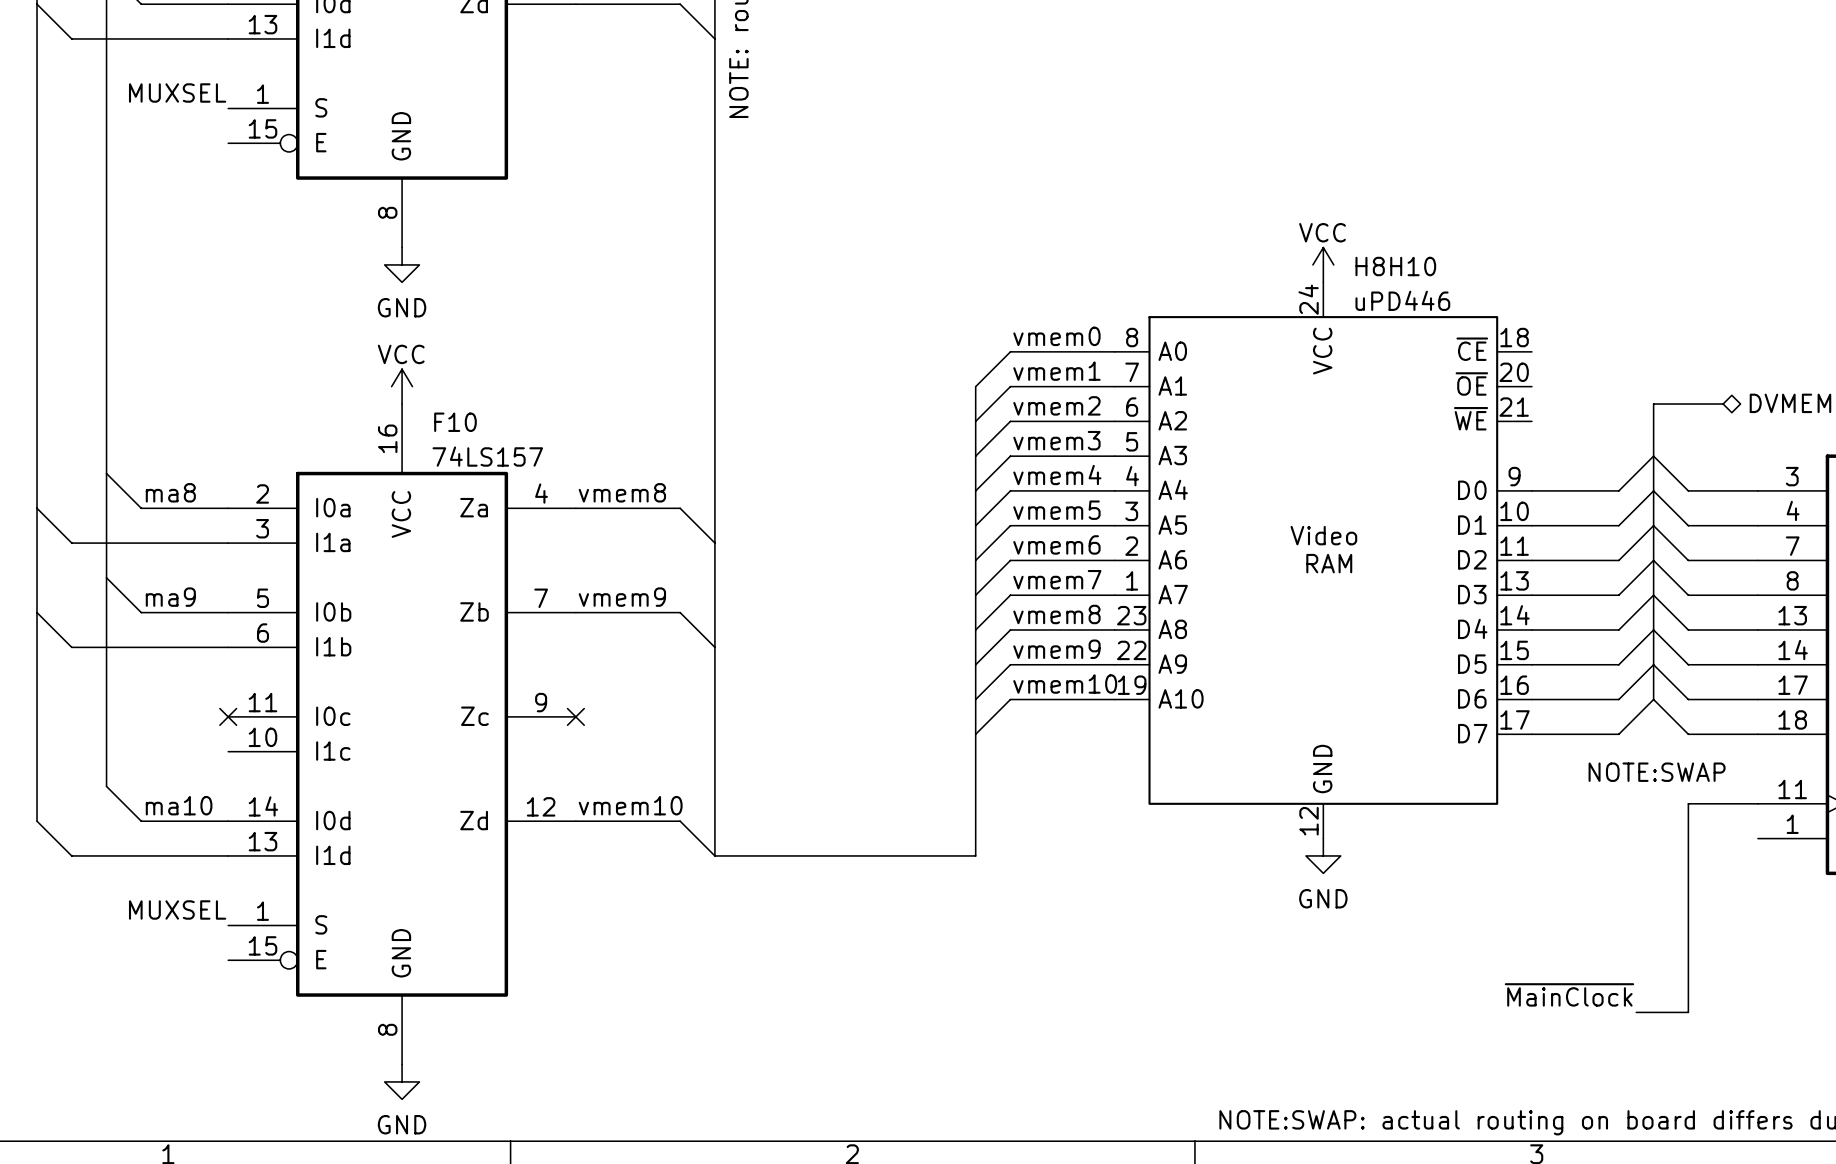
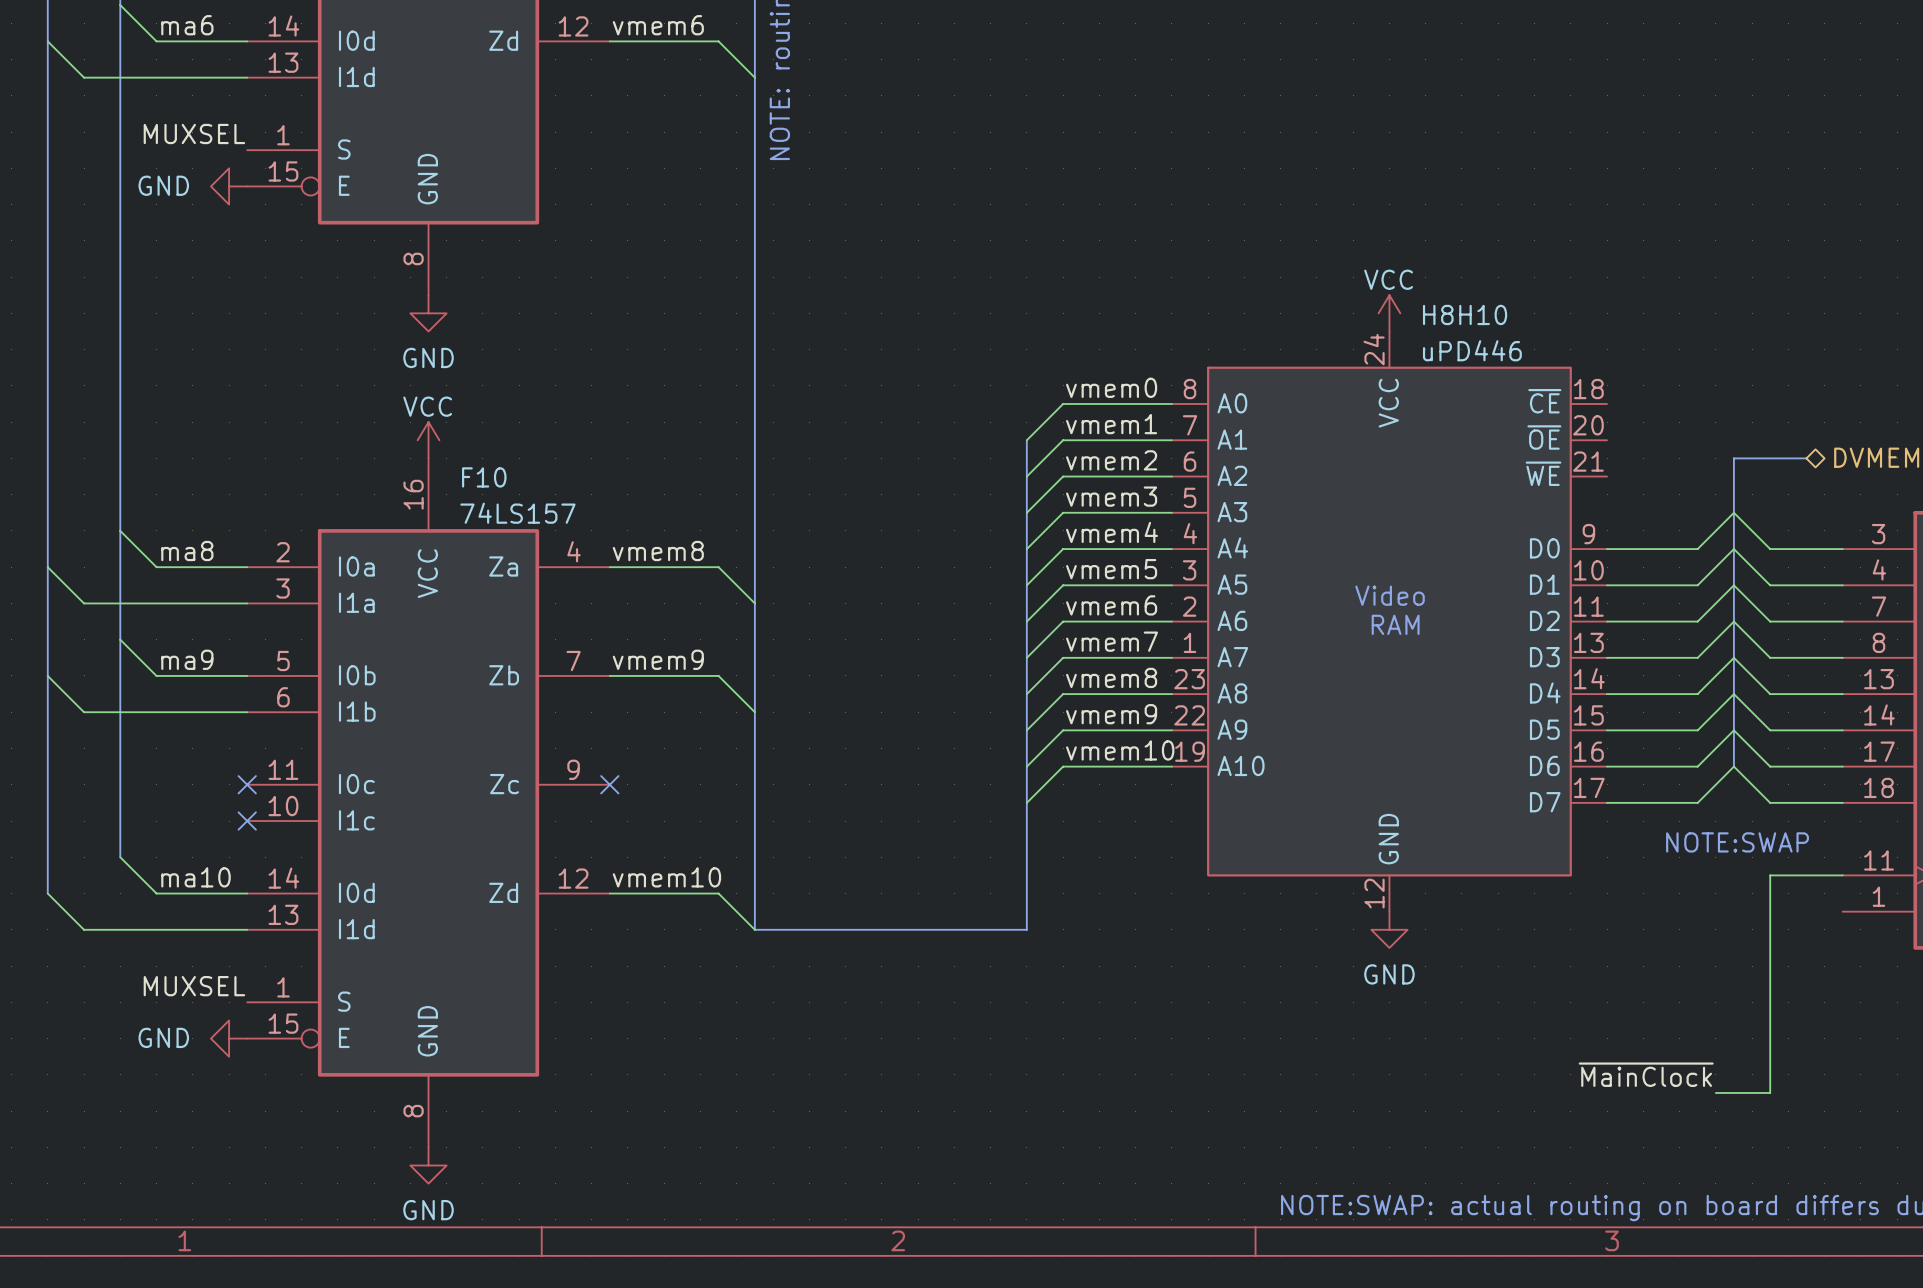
power symbol: none -> GND (229, 186)
no-connect mark: none -> (247, 821)
power symbol: none -> GND (229, 1038)

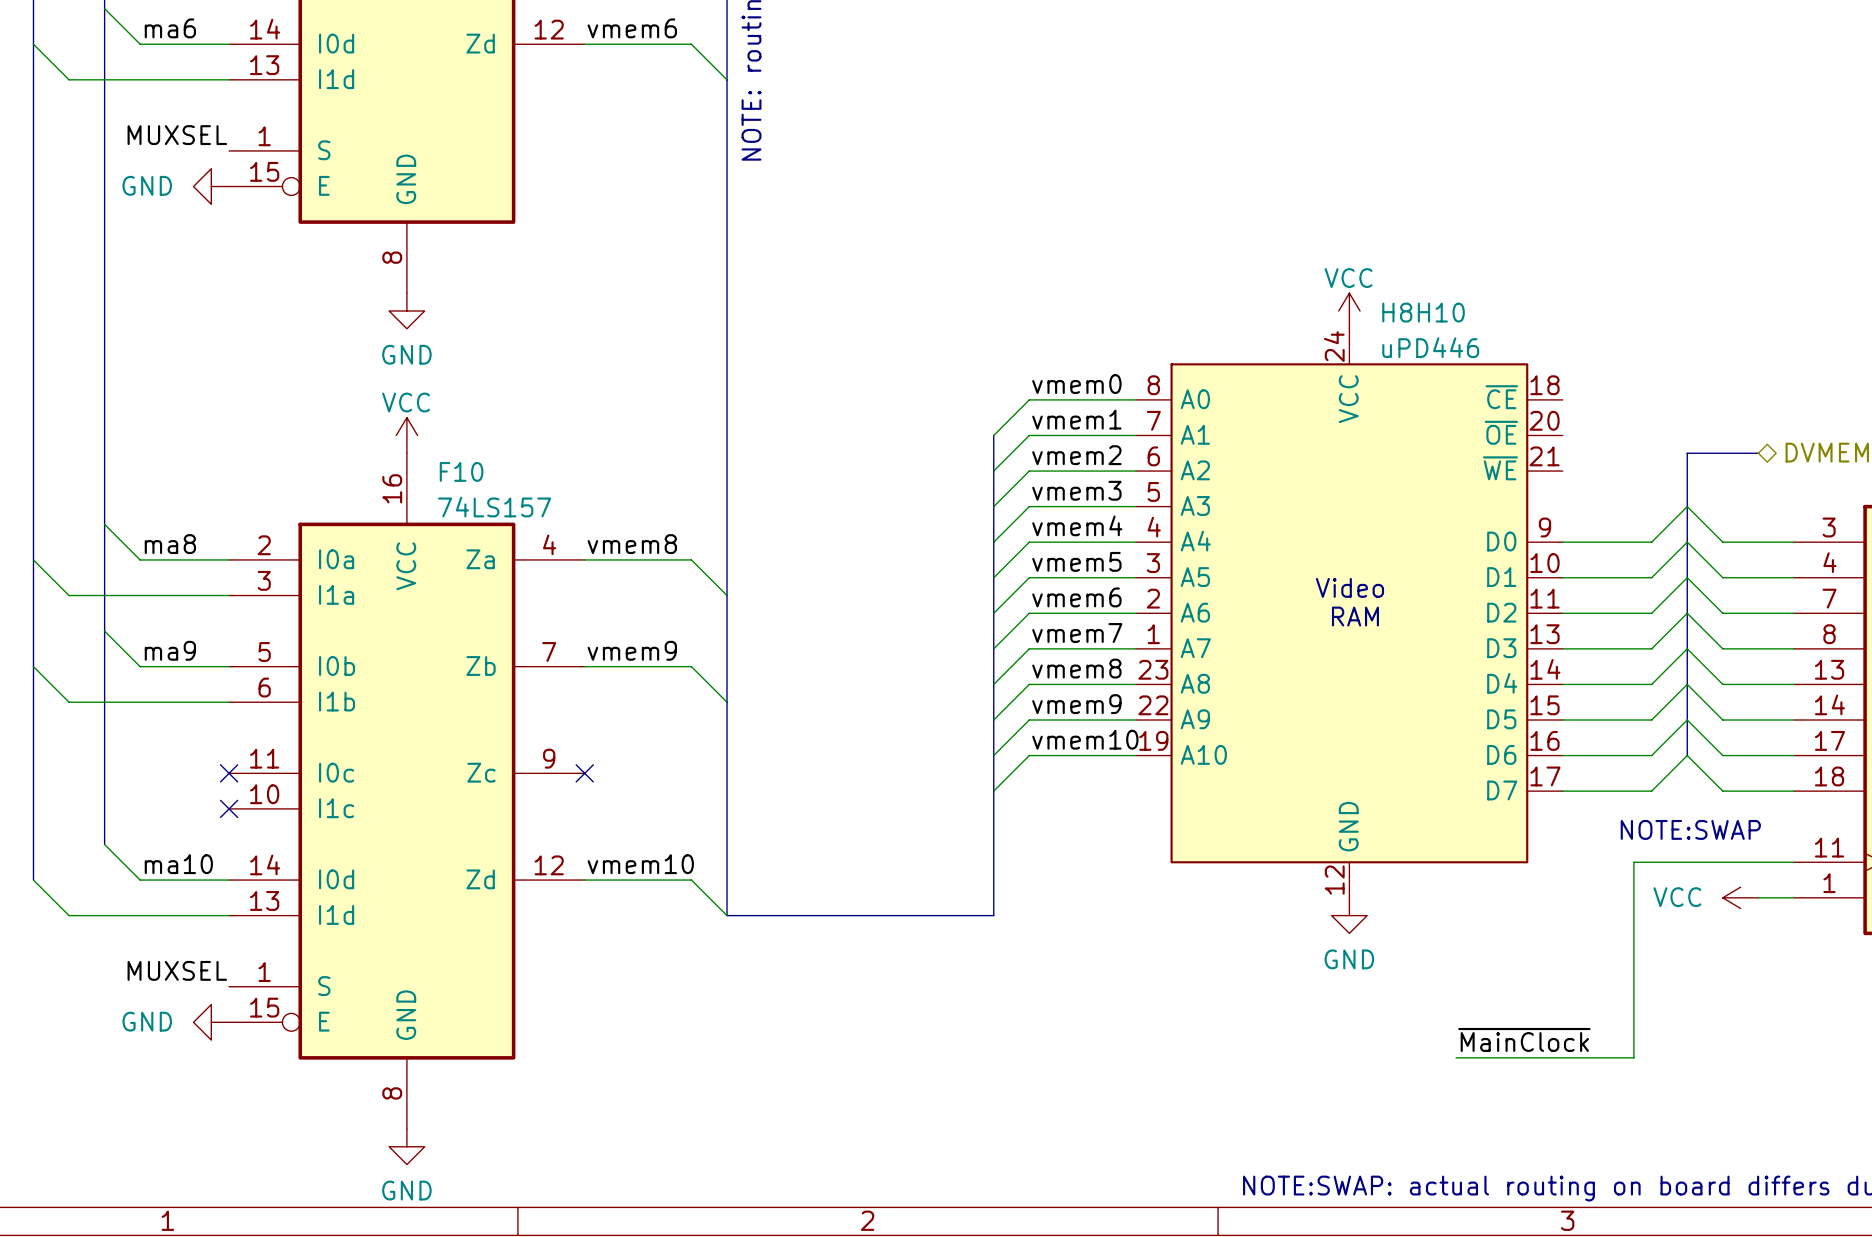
wire: (1770, 875) (1770, 1092) (1715, 1092) -> (1722, 862) (1633, 862) (1633, 1057) (1456, 1057)
power symbol: none -> VCC (1740, 897)
wire: none -> (1758, 897) (1793, 897)
label position: ~{MainClock} (1646, 1074) -> ~{MainClock} (1524, 1039)

